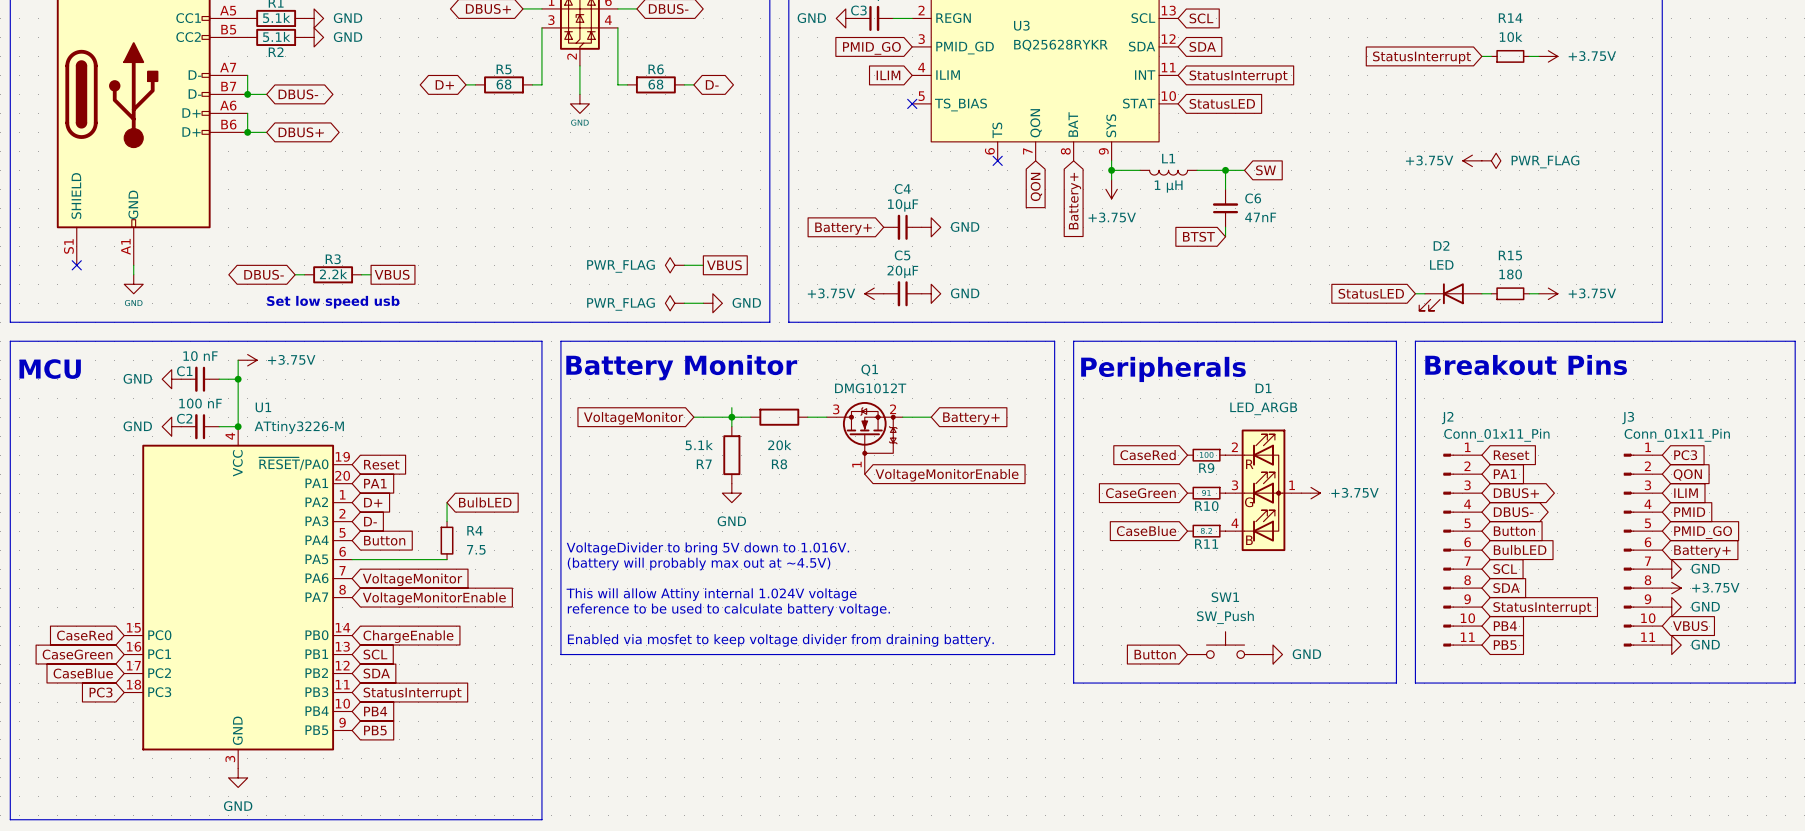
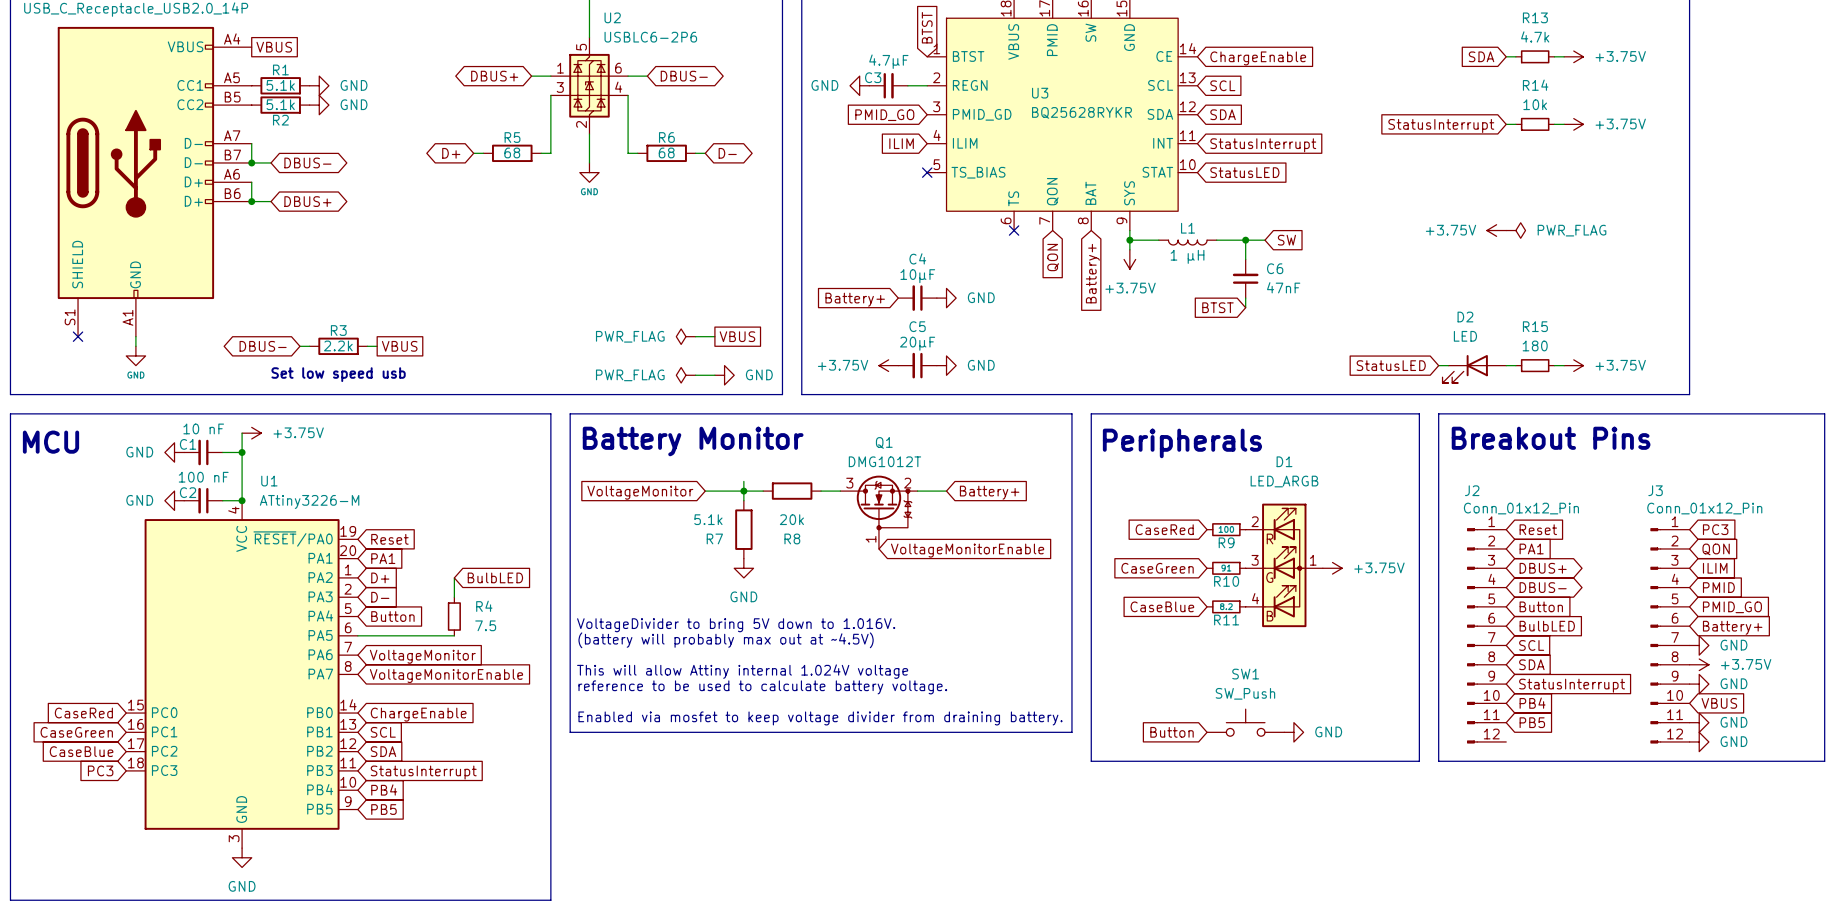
J2 value: Conn_01x11_Pin (1496, 435) -> Conn_01x12_Pin (1521, 508)
J3 value: Conn_01x11_Pin (1677, 435) -> Conn_01x12_Pin (1704, 508)
J2 symbol: [1443, 453, 1482, 647] -> [1467, 528, 1507, 744]
J3 symbol: [1623, 453, 1663, 647] -> [1650, 528, 1690, 744]
power symbol: none -> GND (1699, 741)

